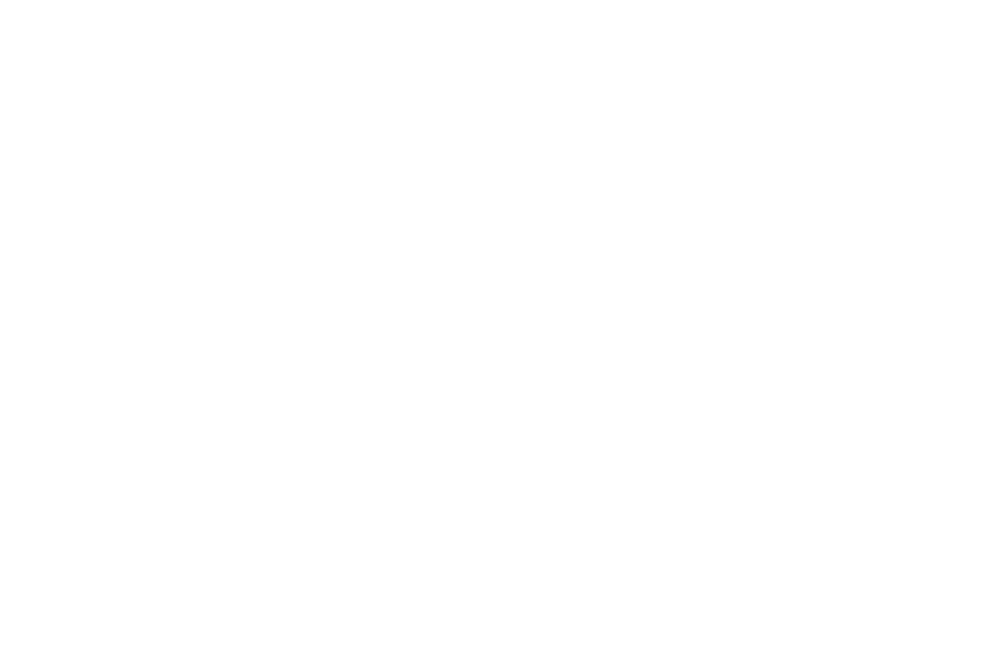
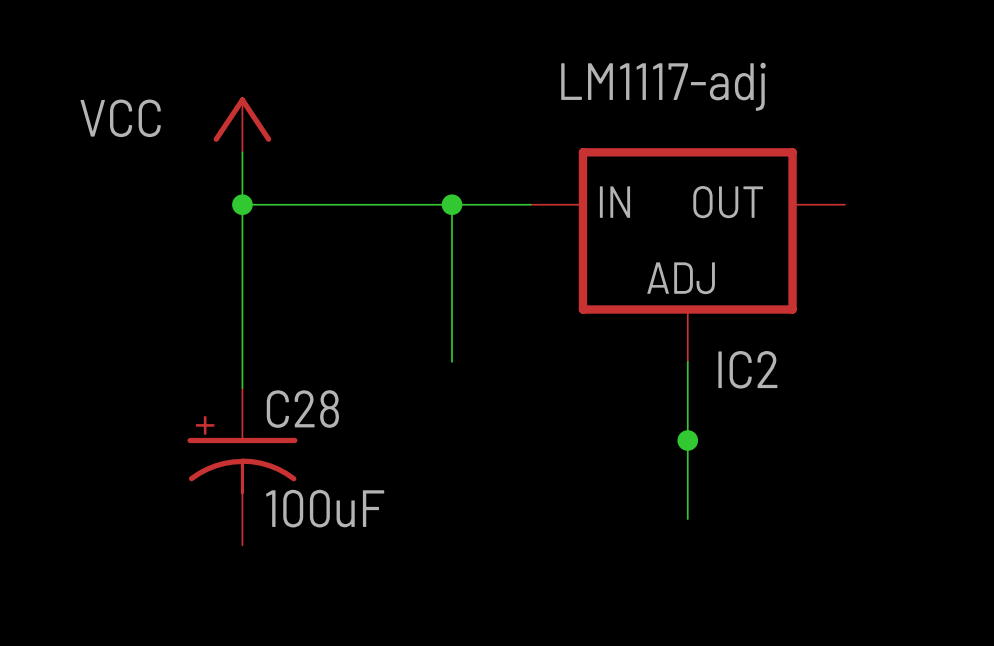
power symbol: none -> VCC (242, 124)
wire: none -> (242, 152) (242, 388)
wire: none -> (242, 204) (530, 204)
junction: none -> (242, 204)
wire: none -> (452, 204) (452, 361)
junction: none -> (452, 204)
IC2: none -> LM1117-adj (687, 255)
wire: none -> (687, 361) (687, 519)
junction: none -> (687, 440)
C28: none -> 100uF (242, 466)

